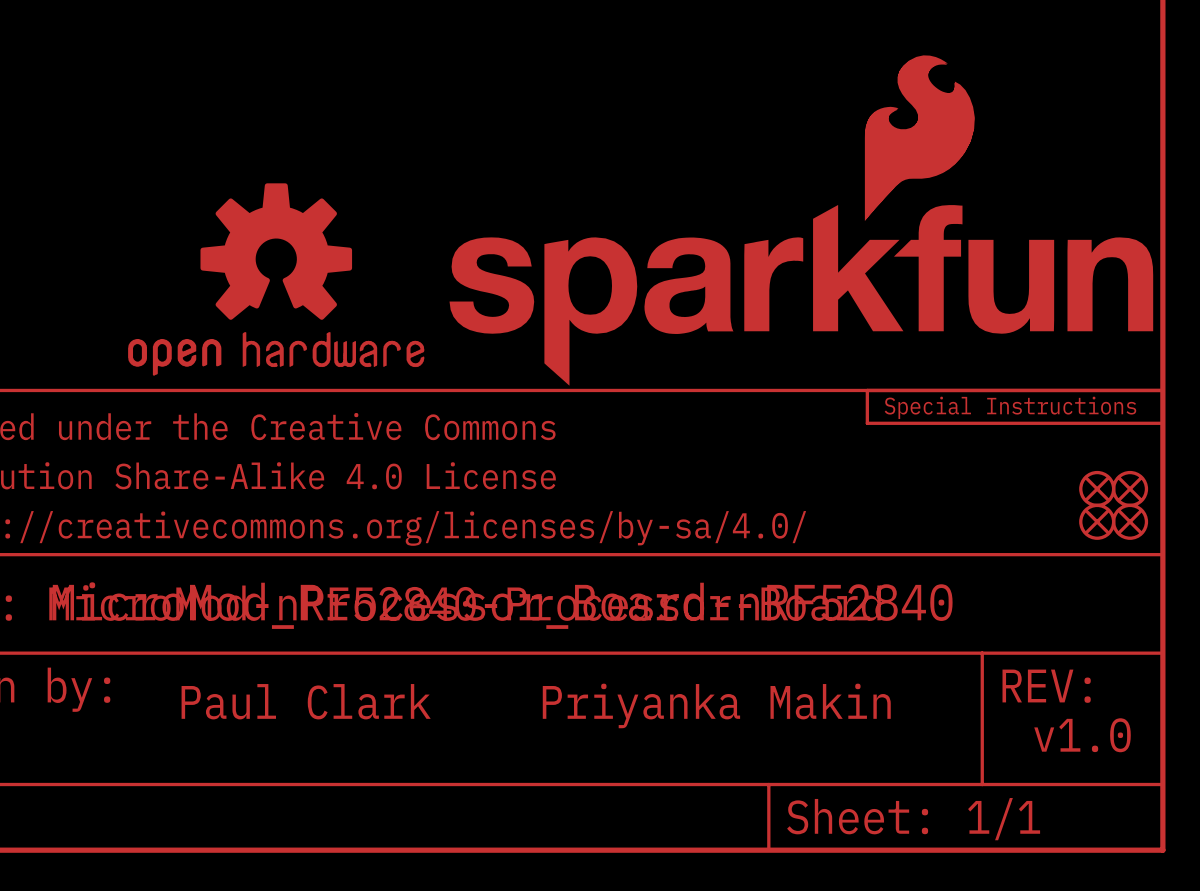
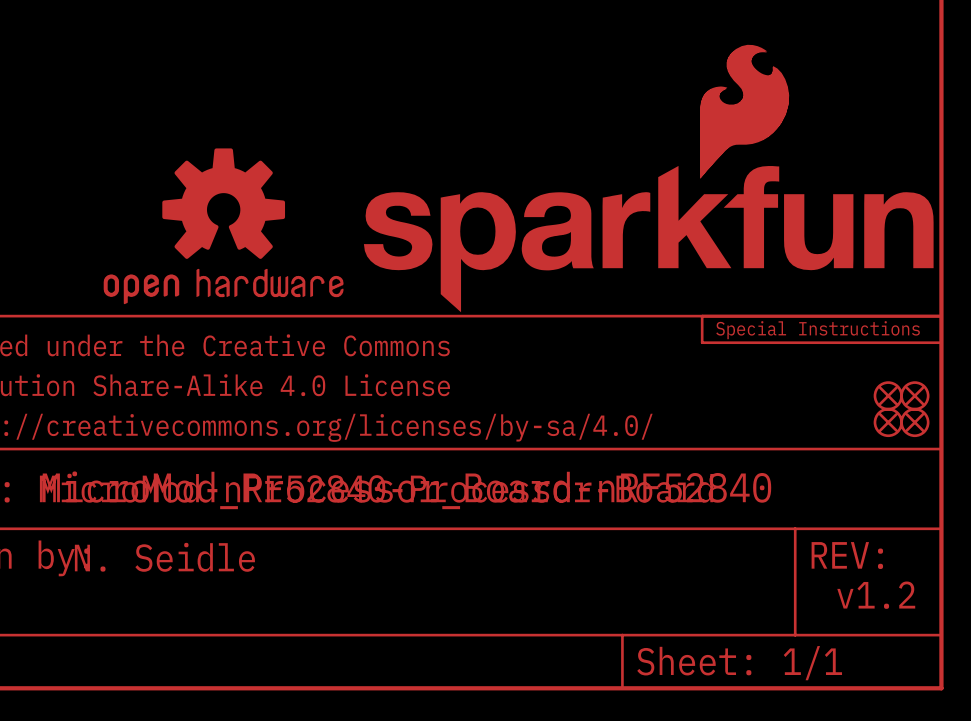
text: none -> N. Seidle (164, 557)
text: Paul Clark (306, 701) -> none
text: Priyanka Makin (716, 705) -> none
text: v1.0 (1082, 735) -> v1.2 (876, 595)

